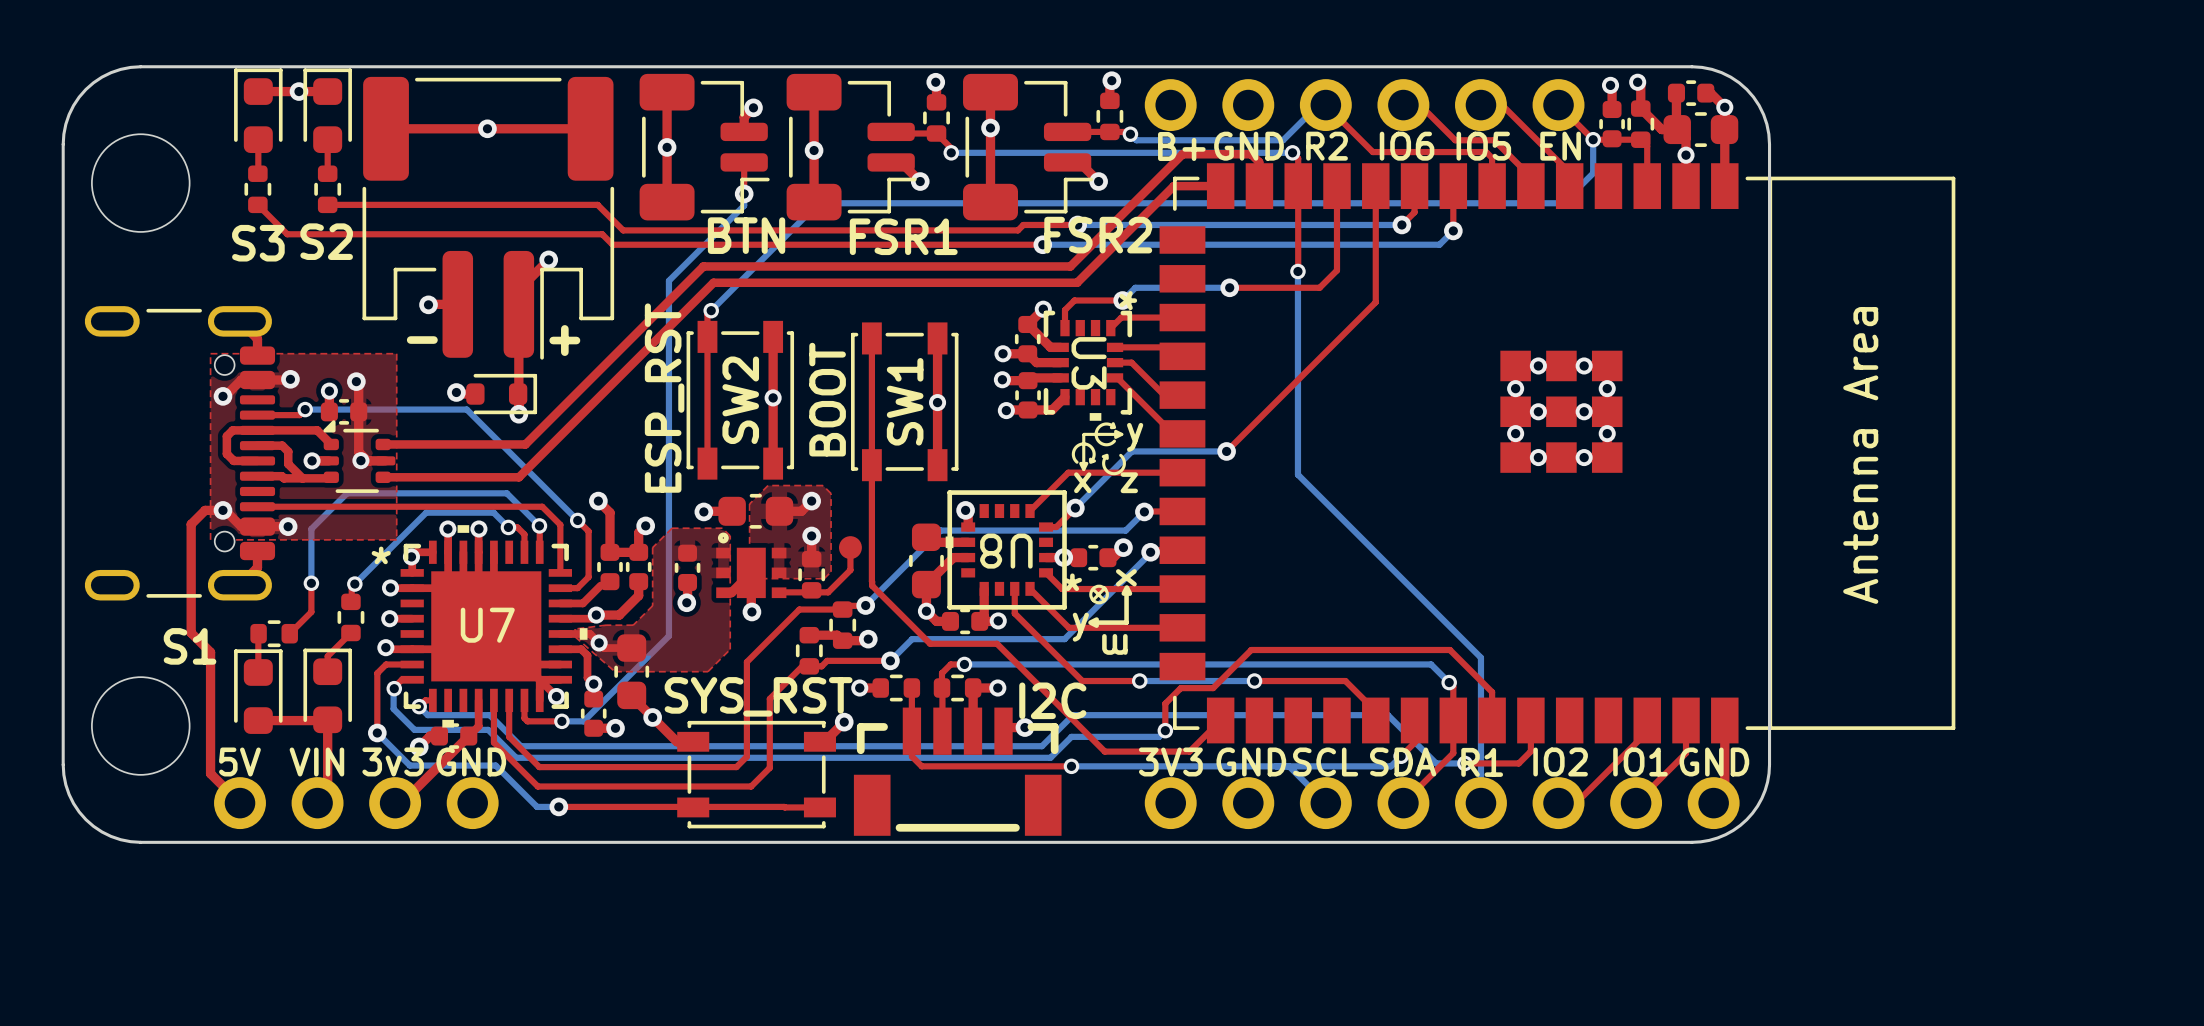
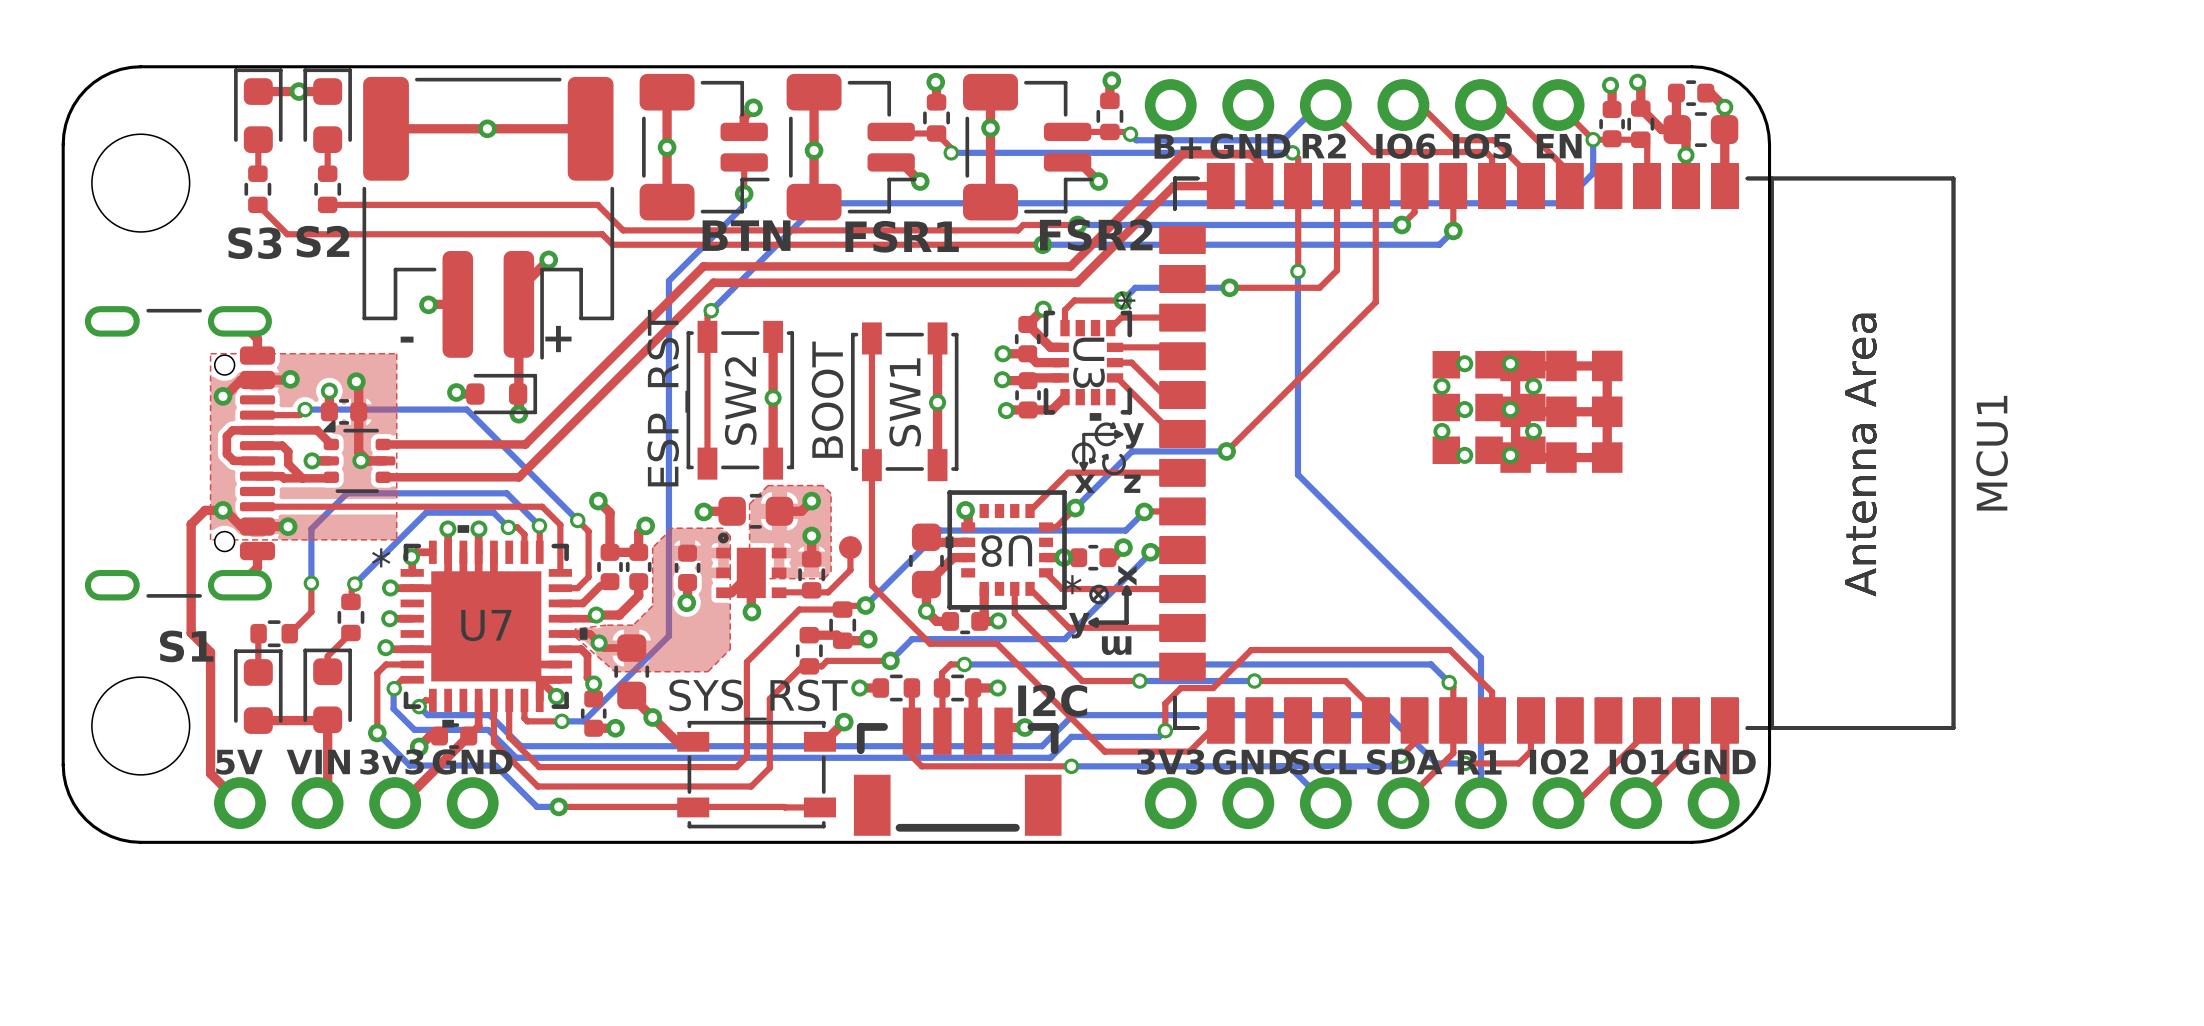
via: none -> (1464, 363)
via: none -> (1510, 363)
via: (1538, 365) -> none
via: (1584, 365) -> none
via: none -> (1441, 386)
via: none -> (1533, 386)
via: (1515, 388) -> none
via: (1607, 388) -> none
via: none -> (1464, 409)
via: none -> (1510, 409)
via: (1538, 411) -> none
via: (1584, 411) -> none
via: none -> (1441, 431)
via: none -> (1533, 431)
via: (1515, 433) -> none
via: (1607, 433) -> none
MCU1: none -> (1557, 453)
via: none -> (1464, 455)
via: none -> (1510, 455)
via: (1538, 457) -> none
via: (1584, 457) -> none

